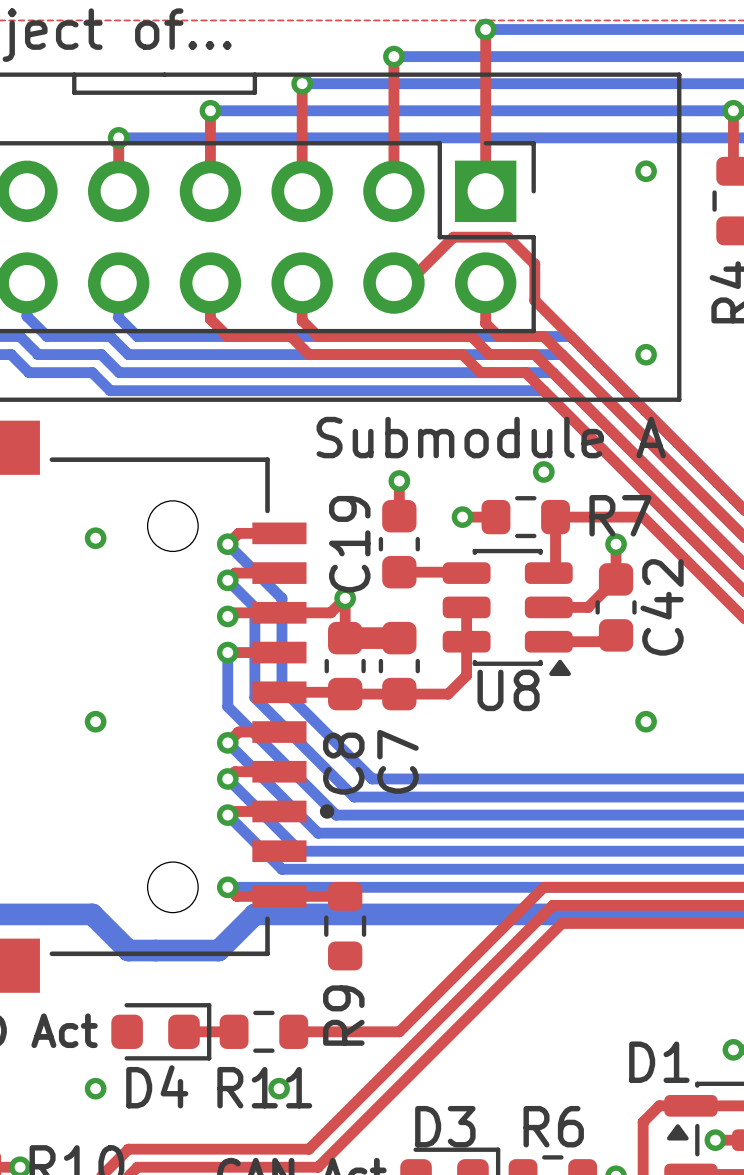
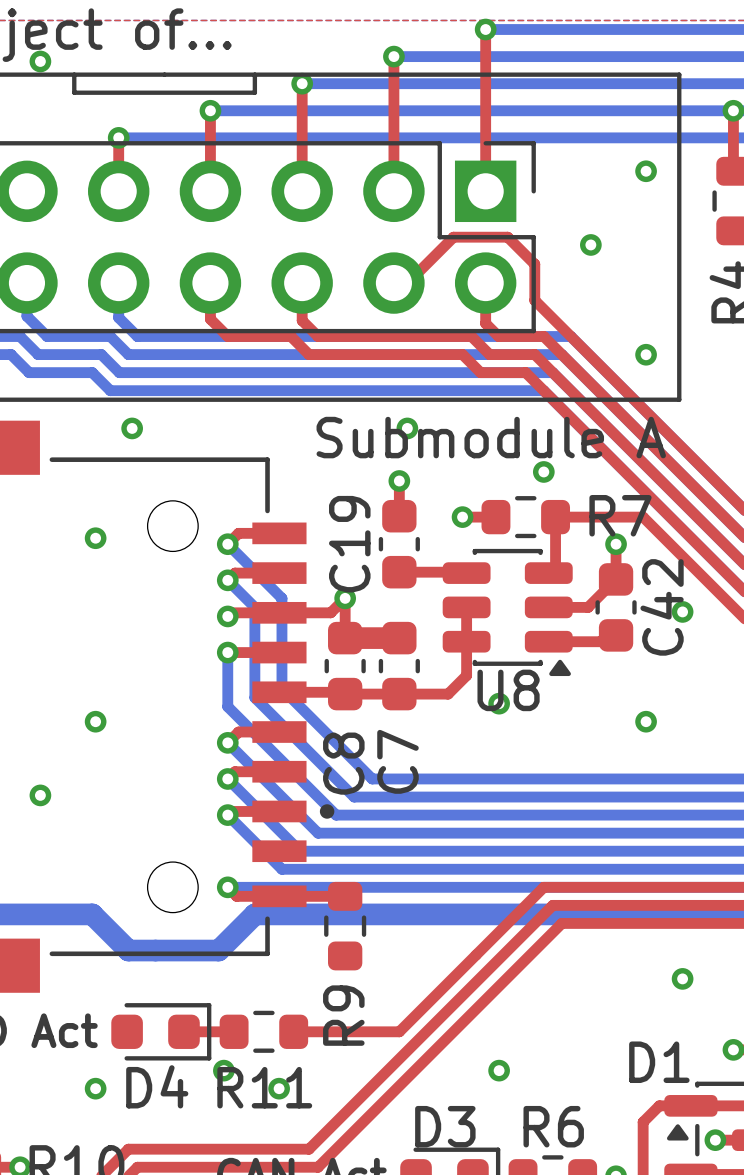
via: none -> (40, 61)
via: none -> (590, 244)
via: none -> (132, 428)
via: none -> (407, 428)
via: none -> (682, 611)
via: none -> (499, 703)
via: none -> (40, 795)
via: none -> (682, 978)
via: none -> (223, 1070)
via: none -> (499, 1070)

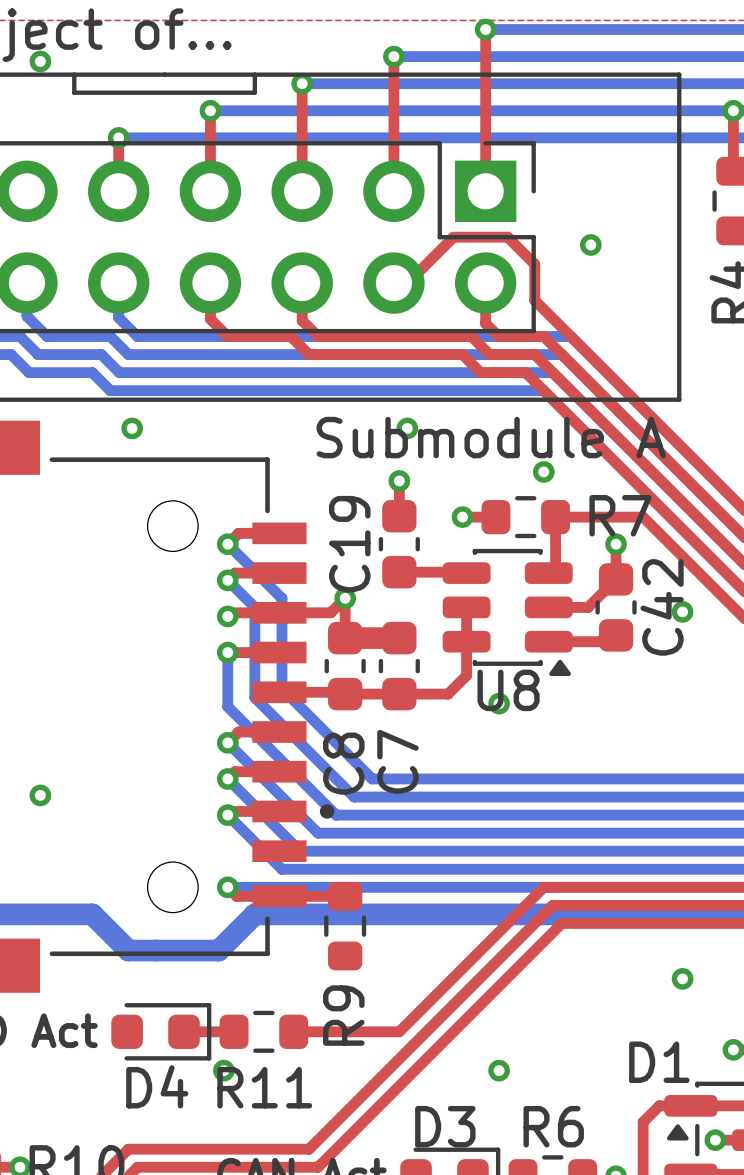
via: (646, 171) -> none
via: (646, 354) -> none
via: (95, 538) -> none
via: (95, 721) -> none
via: (646, 721) -> none
via: (95, 1088) -> none
via: (279, 1088) -> none

